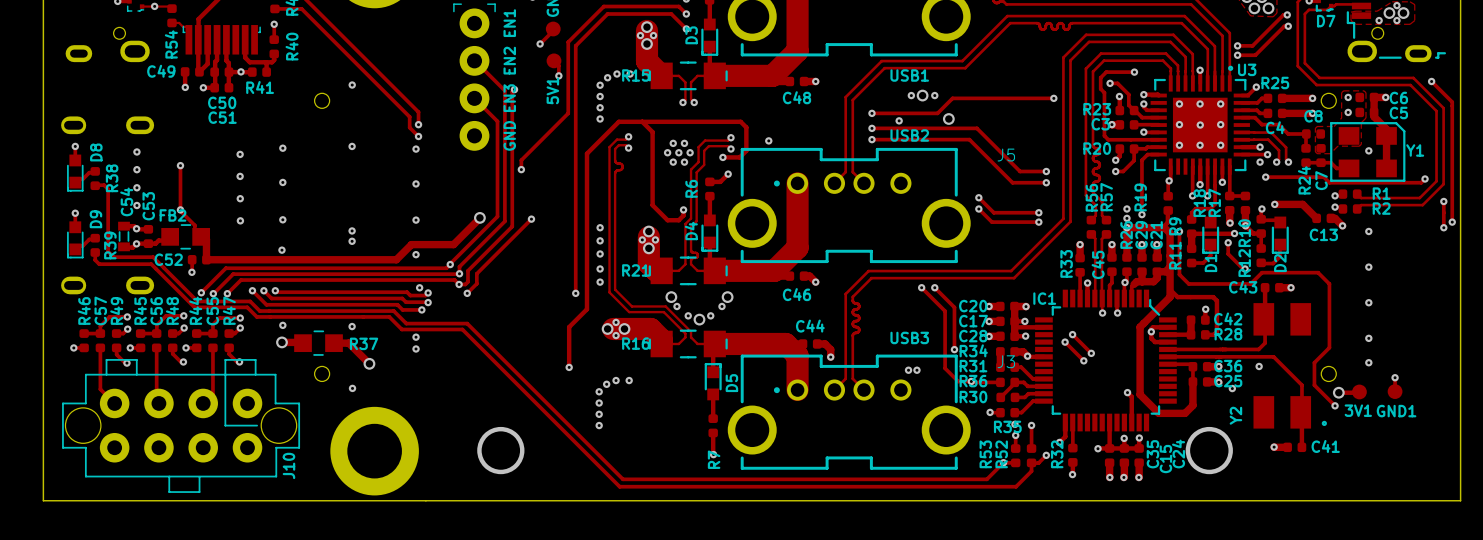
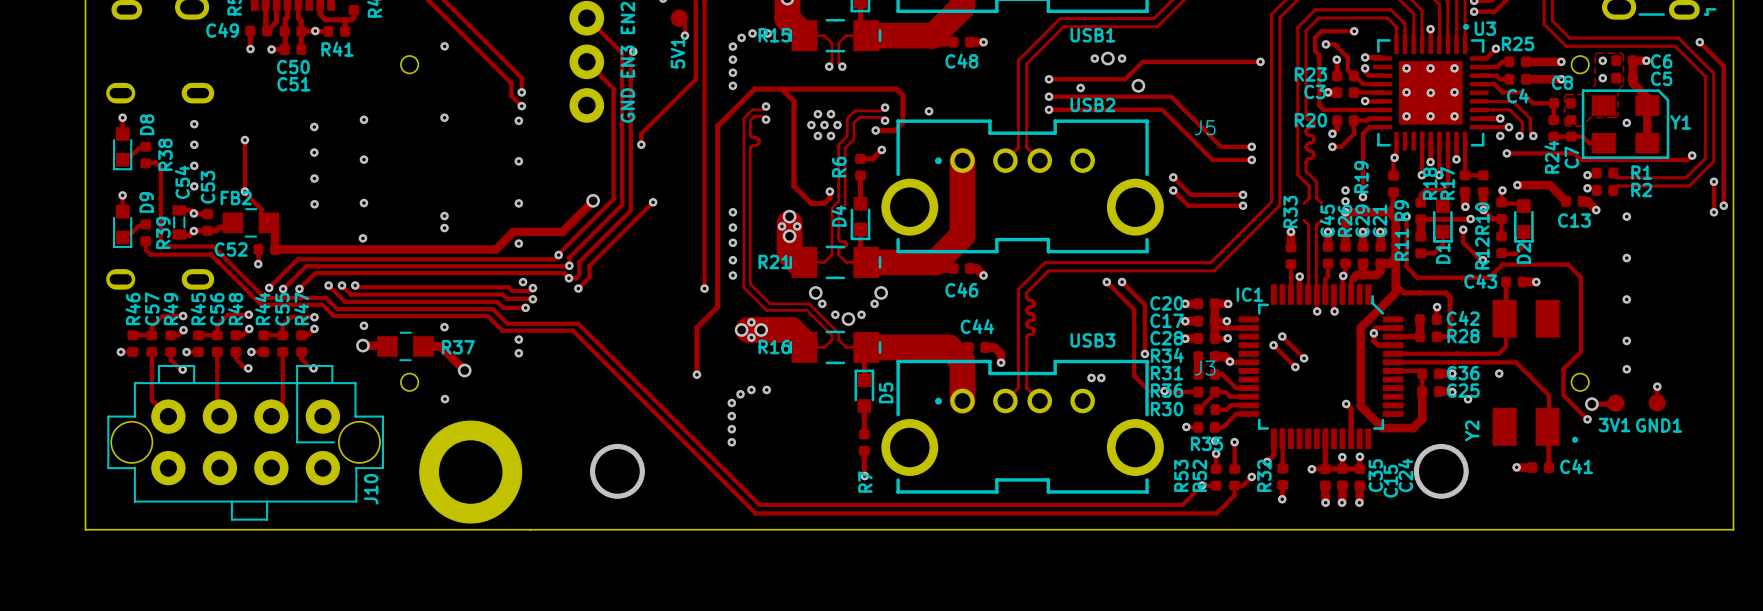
R56: (1091, 227) -> none
R57: (1106, 227) -> none
R33 name position: R33 (1066, 263) -> R33 (1290, 211)
C45 name position: C45 (1098, 264) -> C45 (1327, 220)

